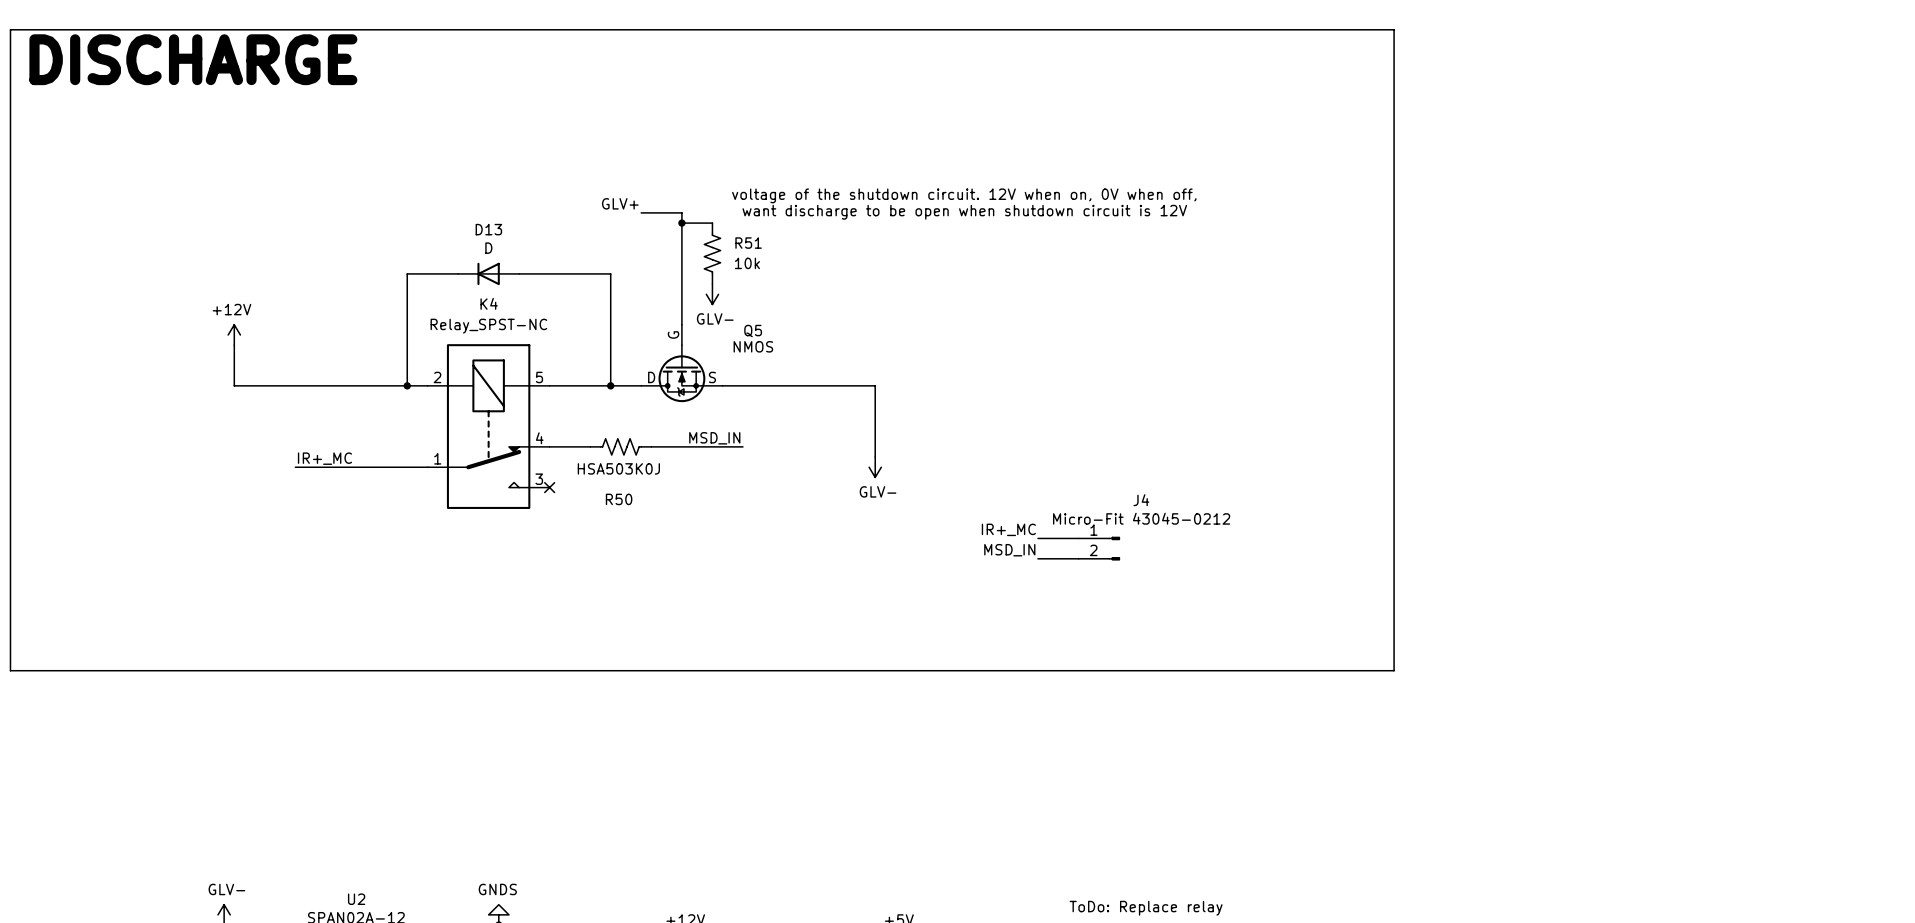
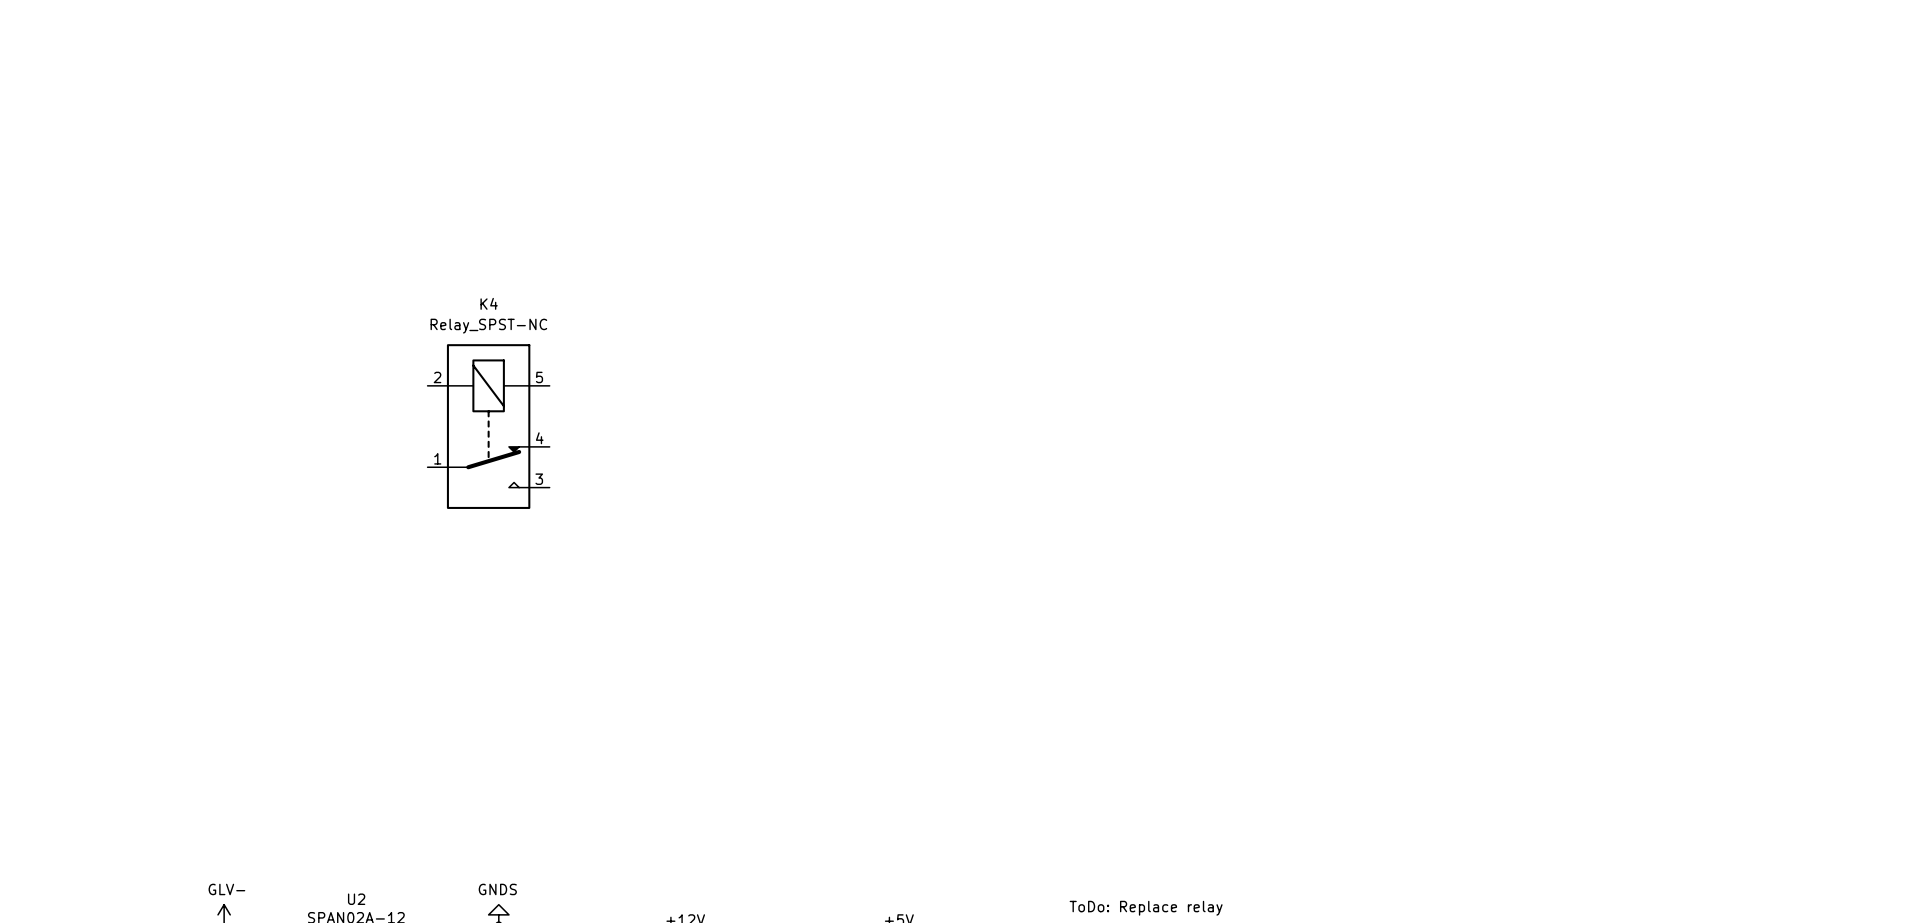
line: (10, 29) (1394, 29) (1394, 670) (10, 670) (10, 29) -> none
text: DISCHARGE (193, 59) -> none
text: voltage of the shutdown circuit. 12V when on, 0V when off, (964, 195) -> none
label: GLV+ (620, 203) -> none
wire: (641, 212) (681, 212) (681, 324) -> none
text: want discharge to be open when shutdown circuit is 12V (964, 212) -> none
wire: (681, 223) (712, 223) -> none
junction: (681, 223) -> none
R51: 10k (712, 253) -> none
wire: (458, 273) (407, 273) (407, 385) -> none
D13: D (488, 273) -> none
wire: (519, 273) (610, 273) (610, 385) -> none
power symbol: GLV- (712, 294) -> none
power symbol: +12V (234, 334) -> none
wire: (234, 345) (234, 385) (427, 385) -> none
Q5: NMOS (681, 363) -> none
junction: (407, 385) -> none
wire: (549, 385) (641, 385) -> none
junction: (610, 385) -> none
wire: (722, 385) (875, 385) (875, 457) -> none
label: MSD_IN (714, 438) -> none
wire: (549, 446) (590, 446) -> none
R50: HSA503K0J (620, 446) -> none
wire: (651, 446) (742, 446) -> none
label: IR+_MC (324, 458) -> none
wire: (295, 467) (427, 467) -> none
power symbol: GLV- (875, 467) -> none
no-connect mark: (549, 487) -> none
label: IR+_MC (1008, 529) -> none
wire: (1037, 538) (1078, 538) -> none
J4: Micro-Fit 43045-0212 (1099, 548) -> none
label: MSD_IN (1009, 550) -> none
wire: (1037, 558) (1078, 558) -> none

